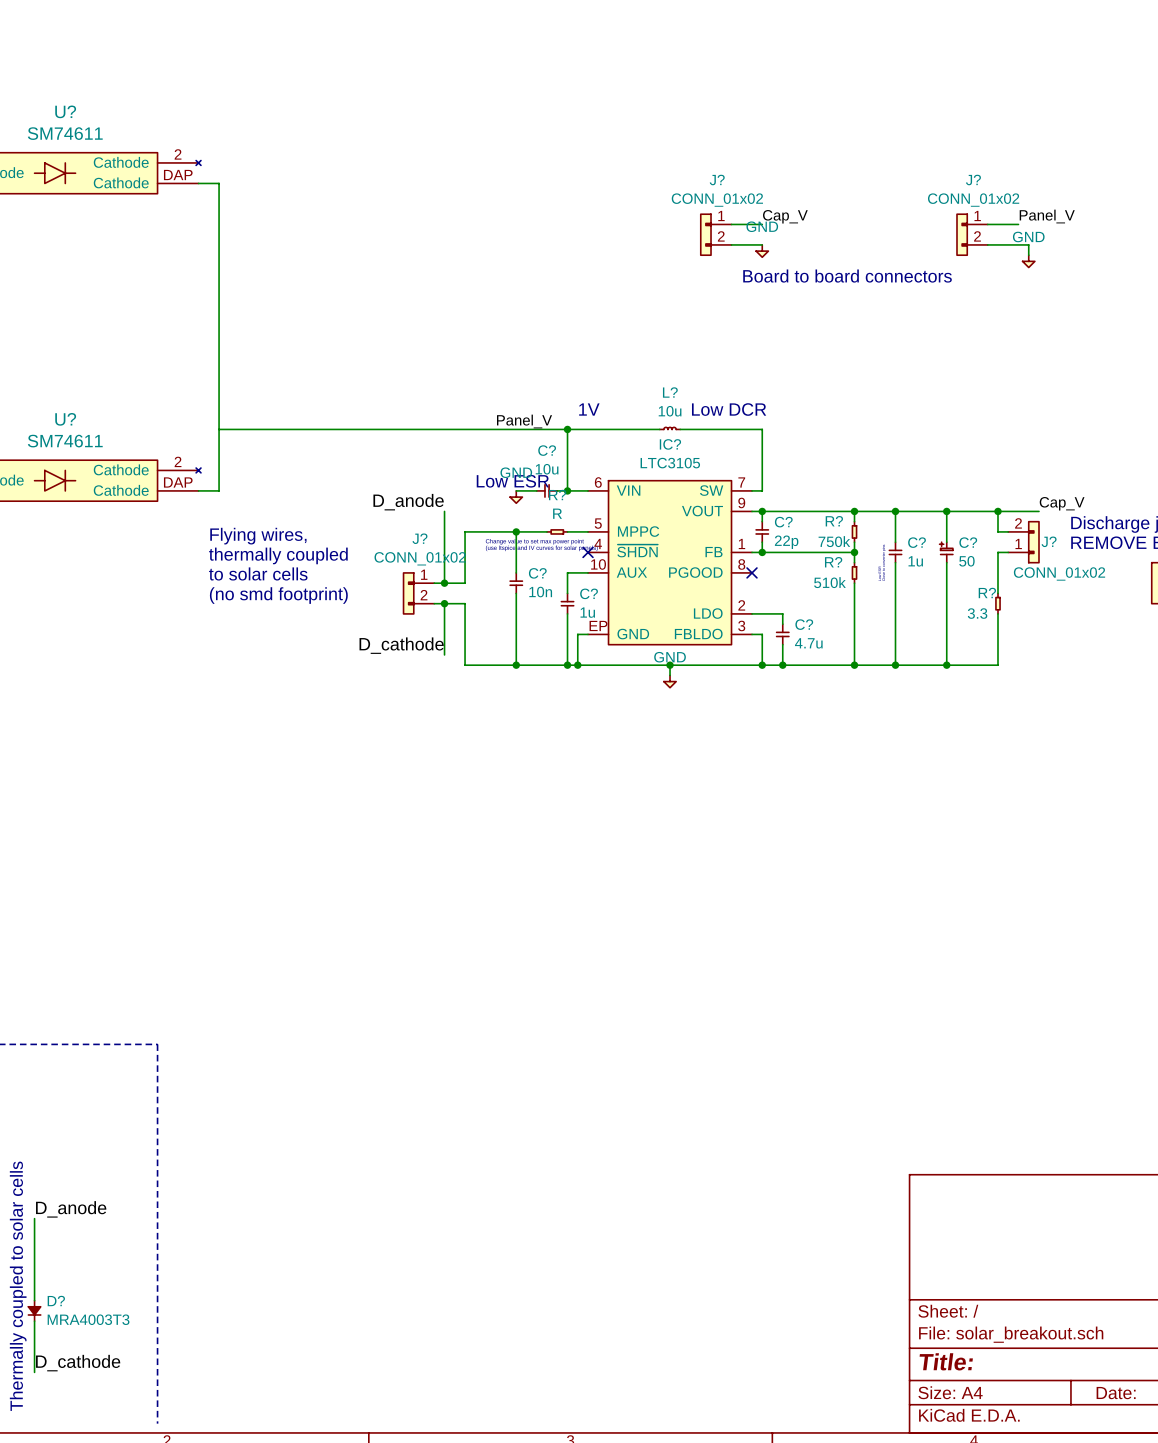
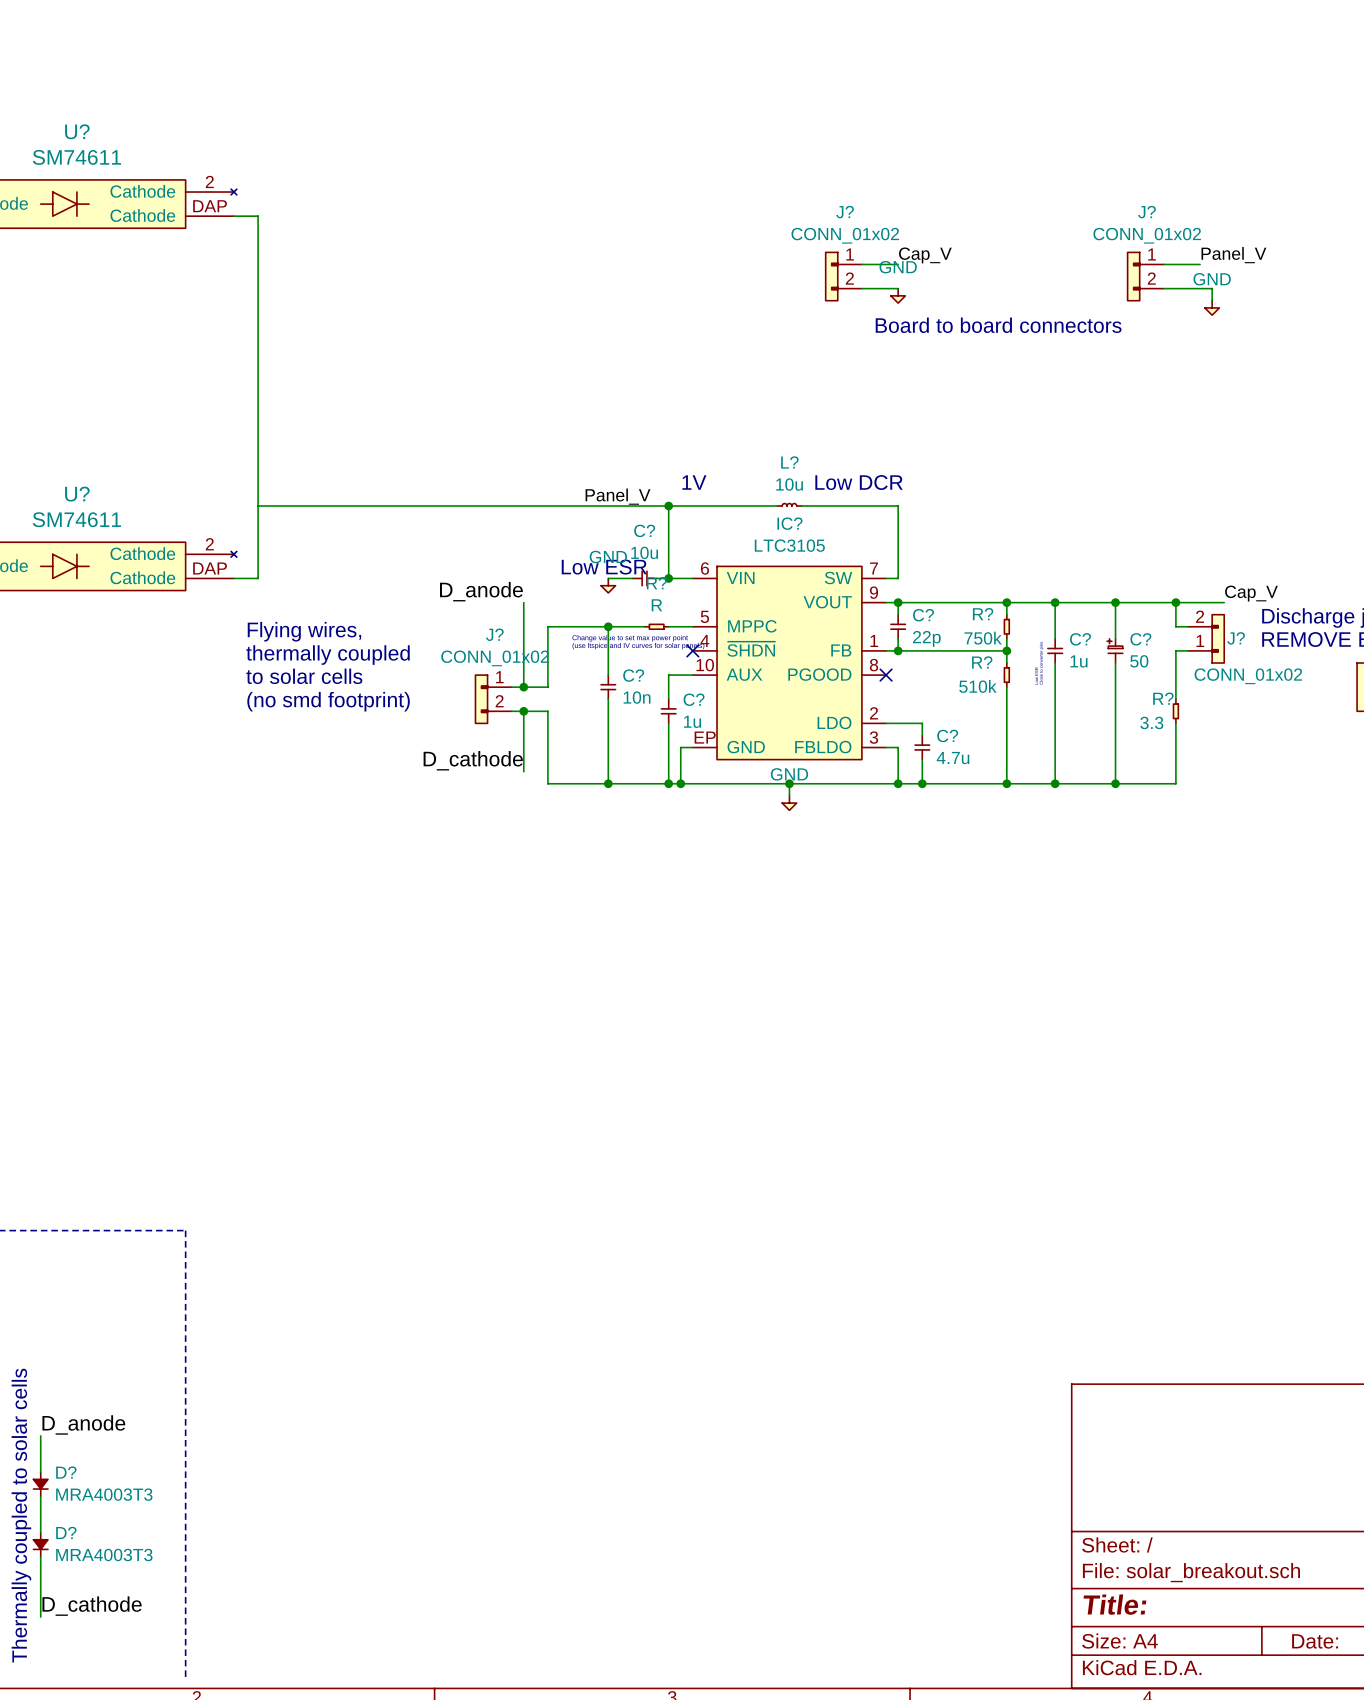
D?: none -> MRA4003T3 (40, 1484)

